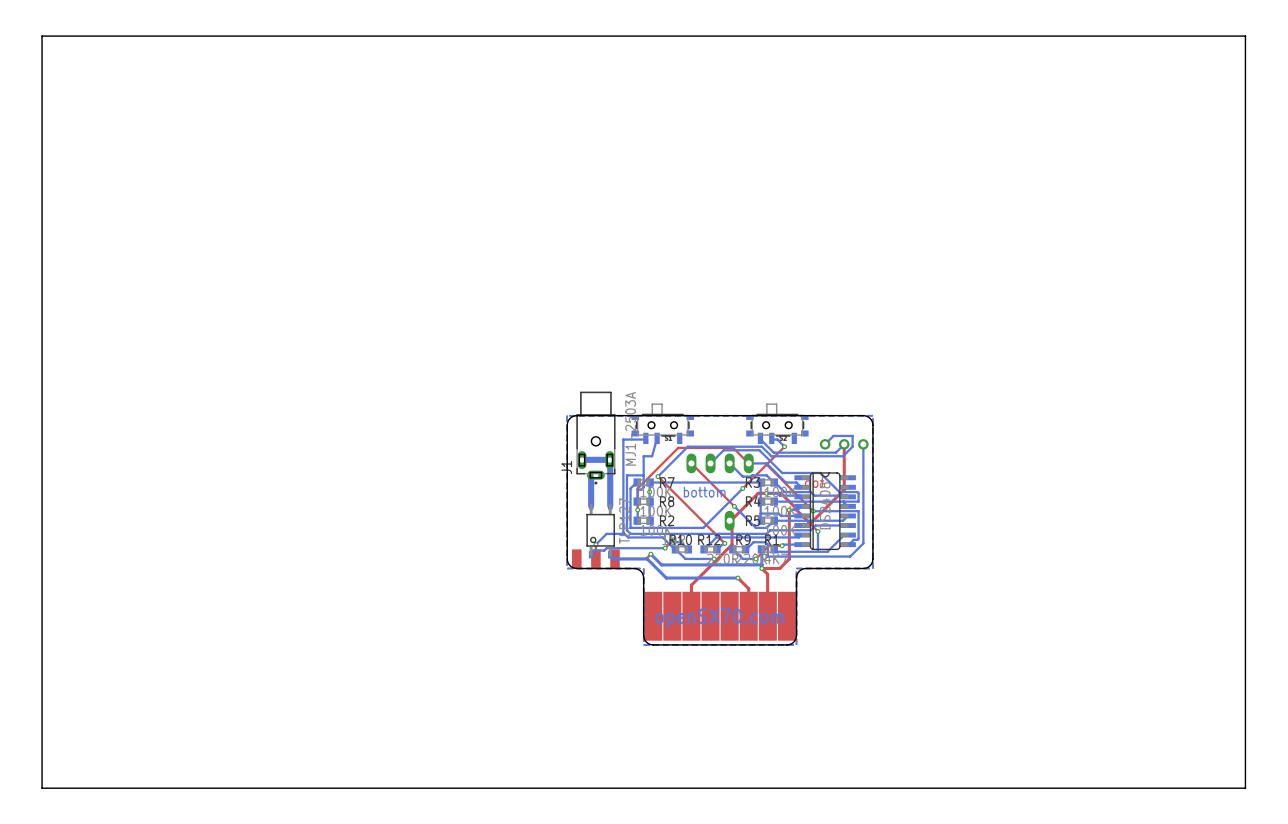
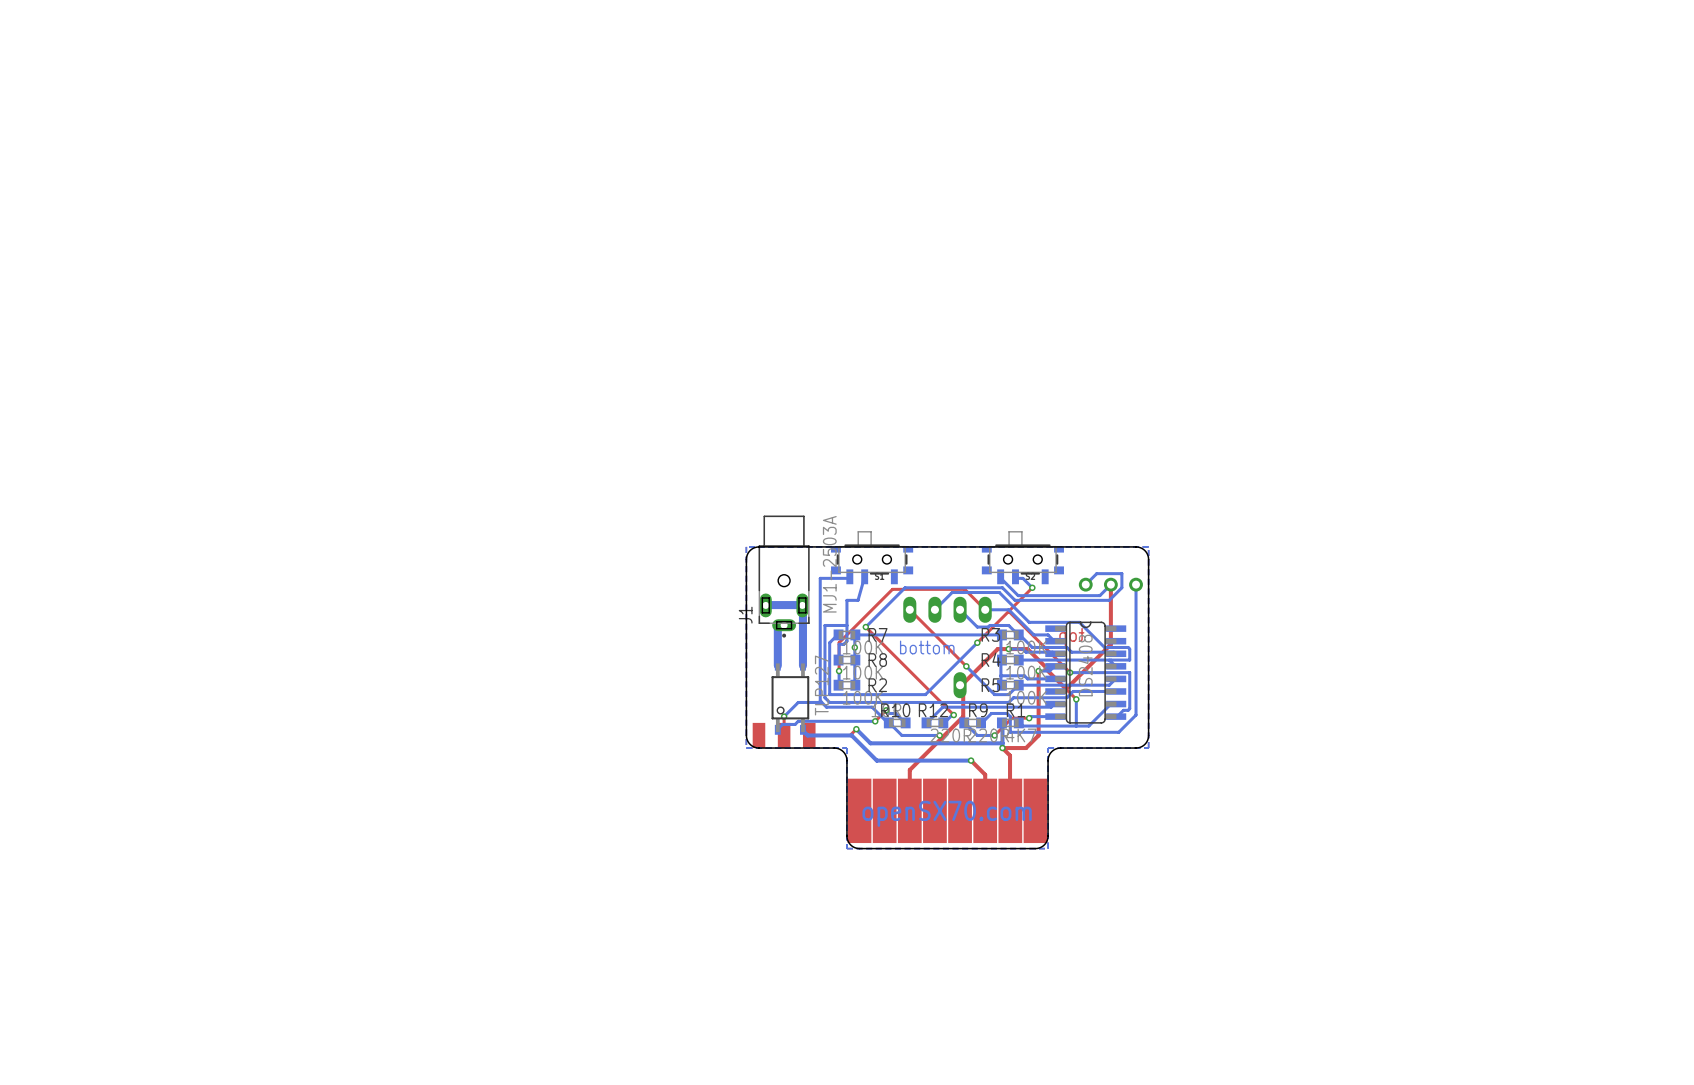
board edge: (1245, 36) (42, 36) (42, 788) (1245, 788) (1245, 36) -> none

